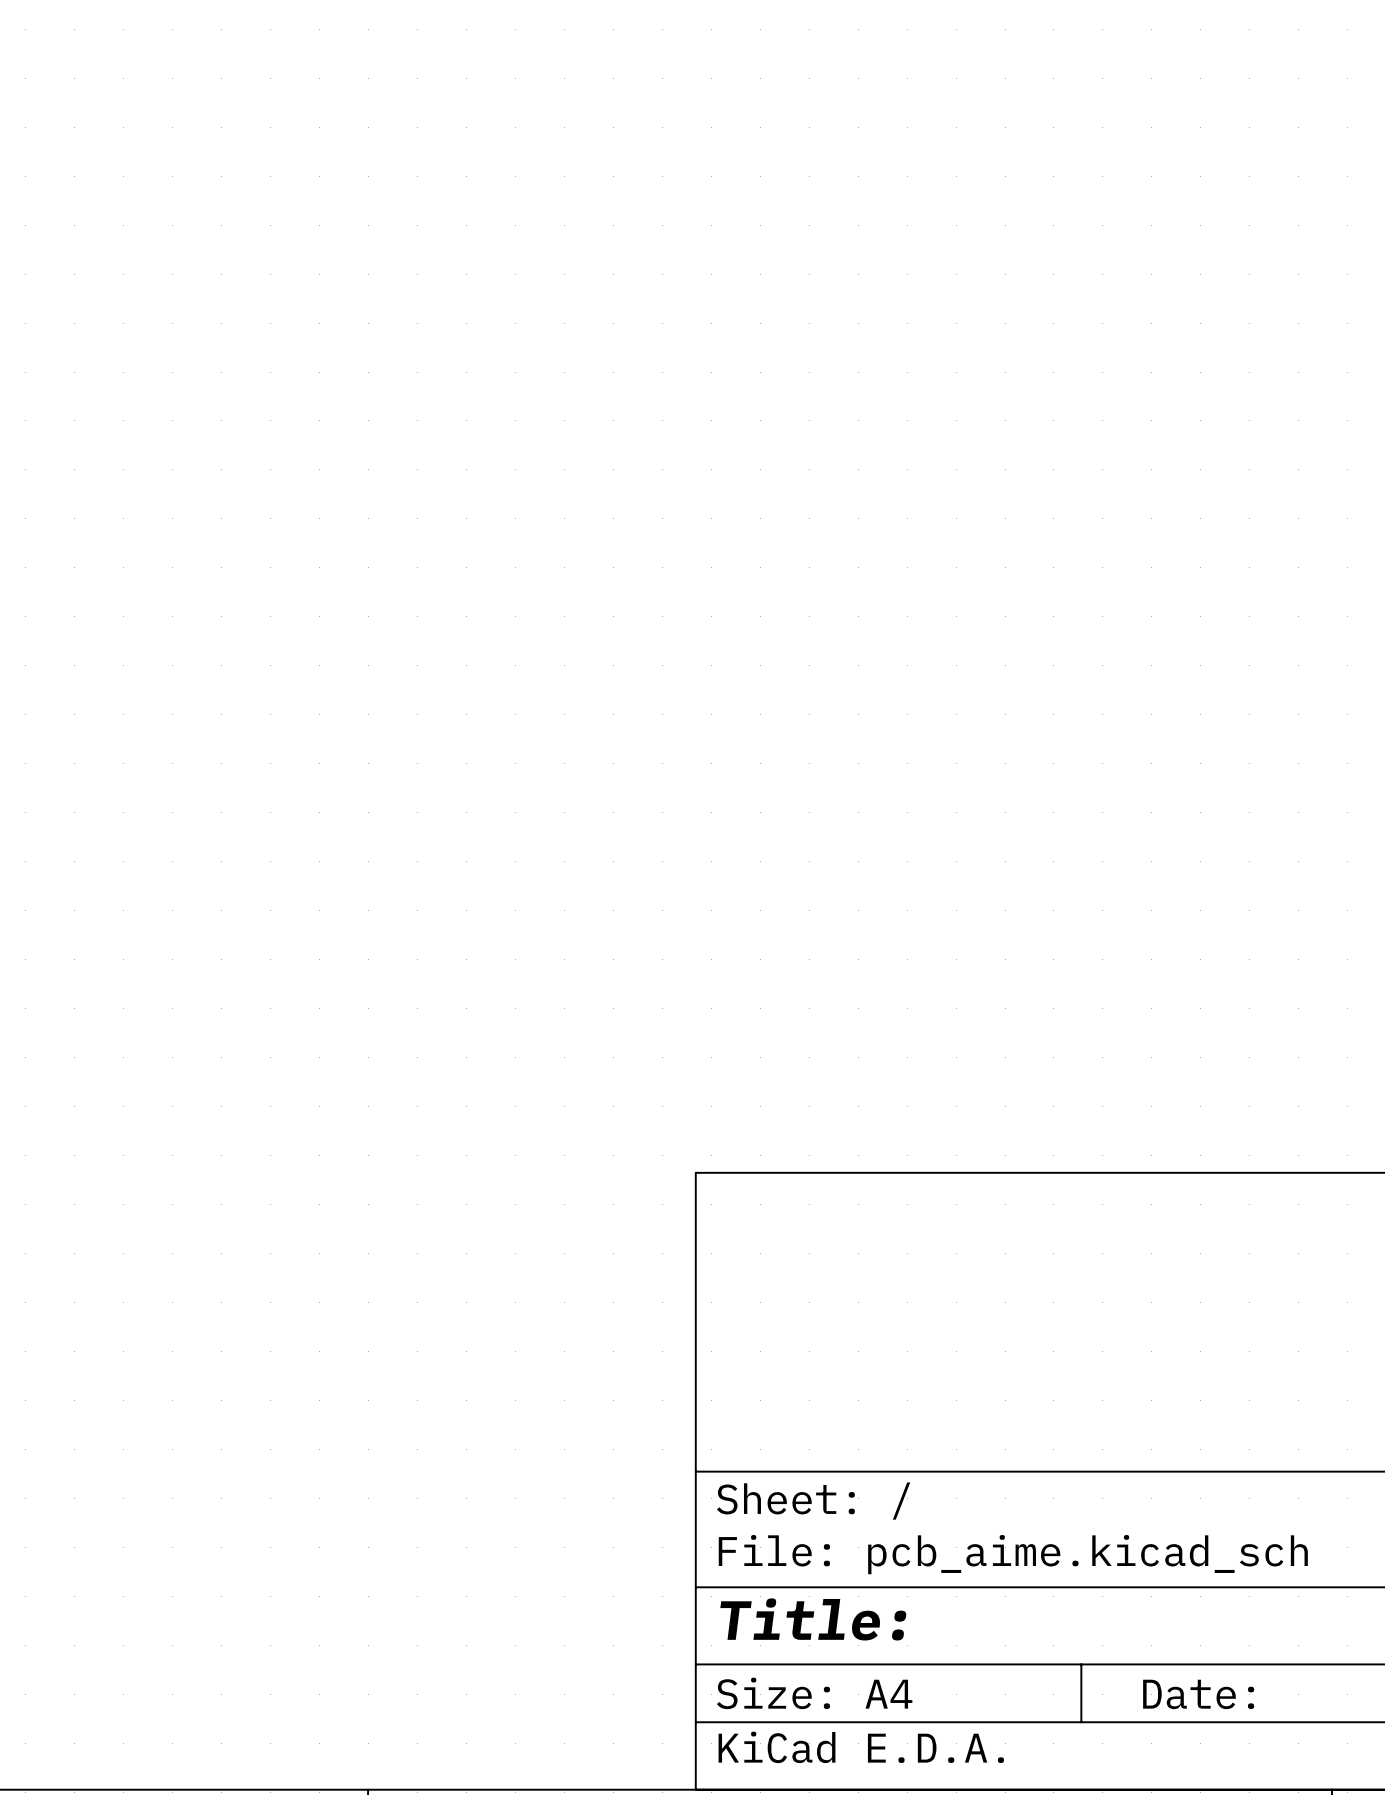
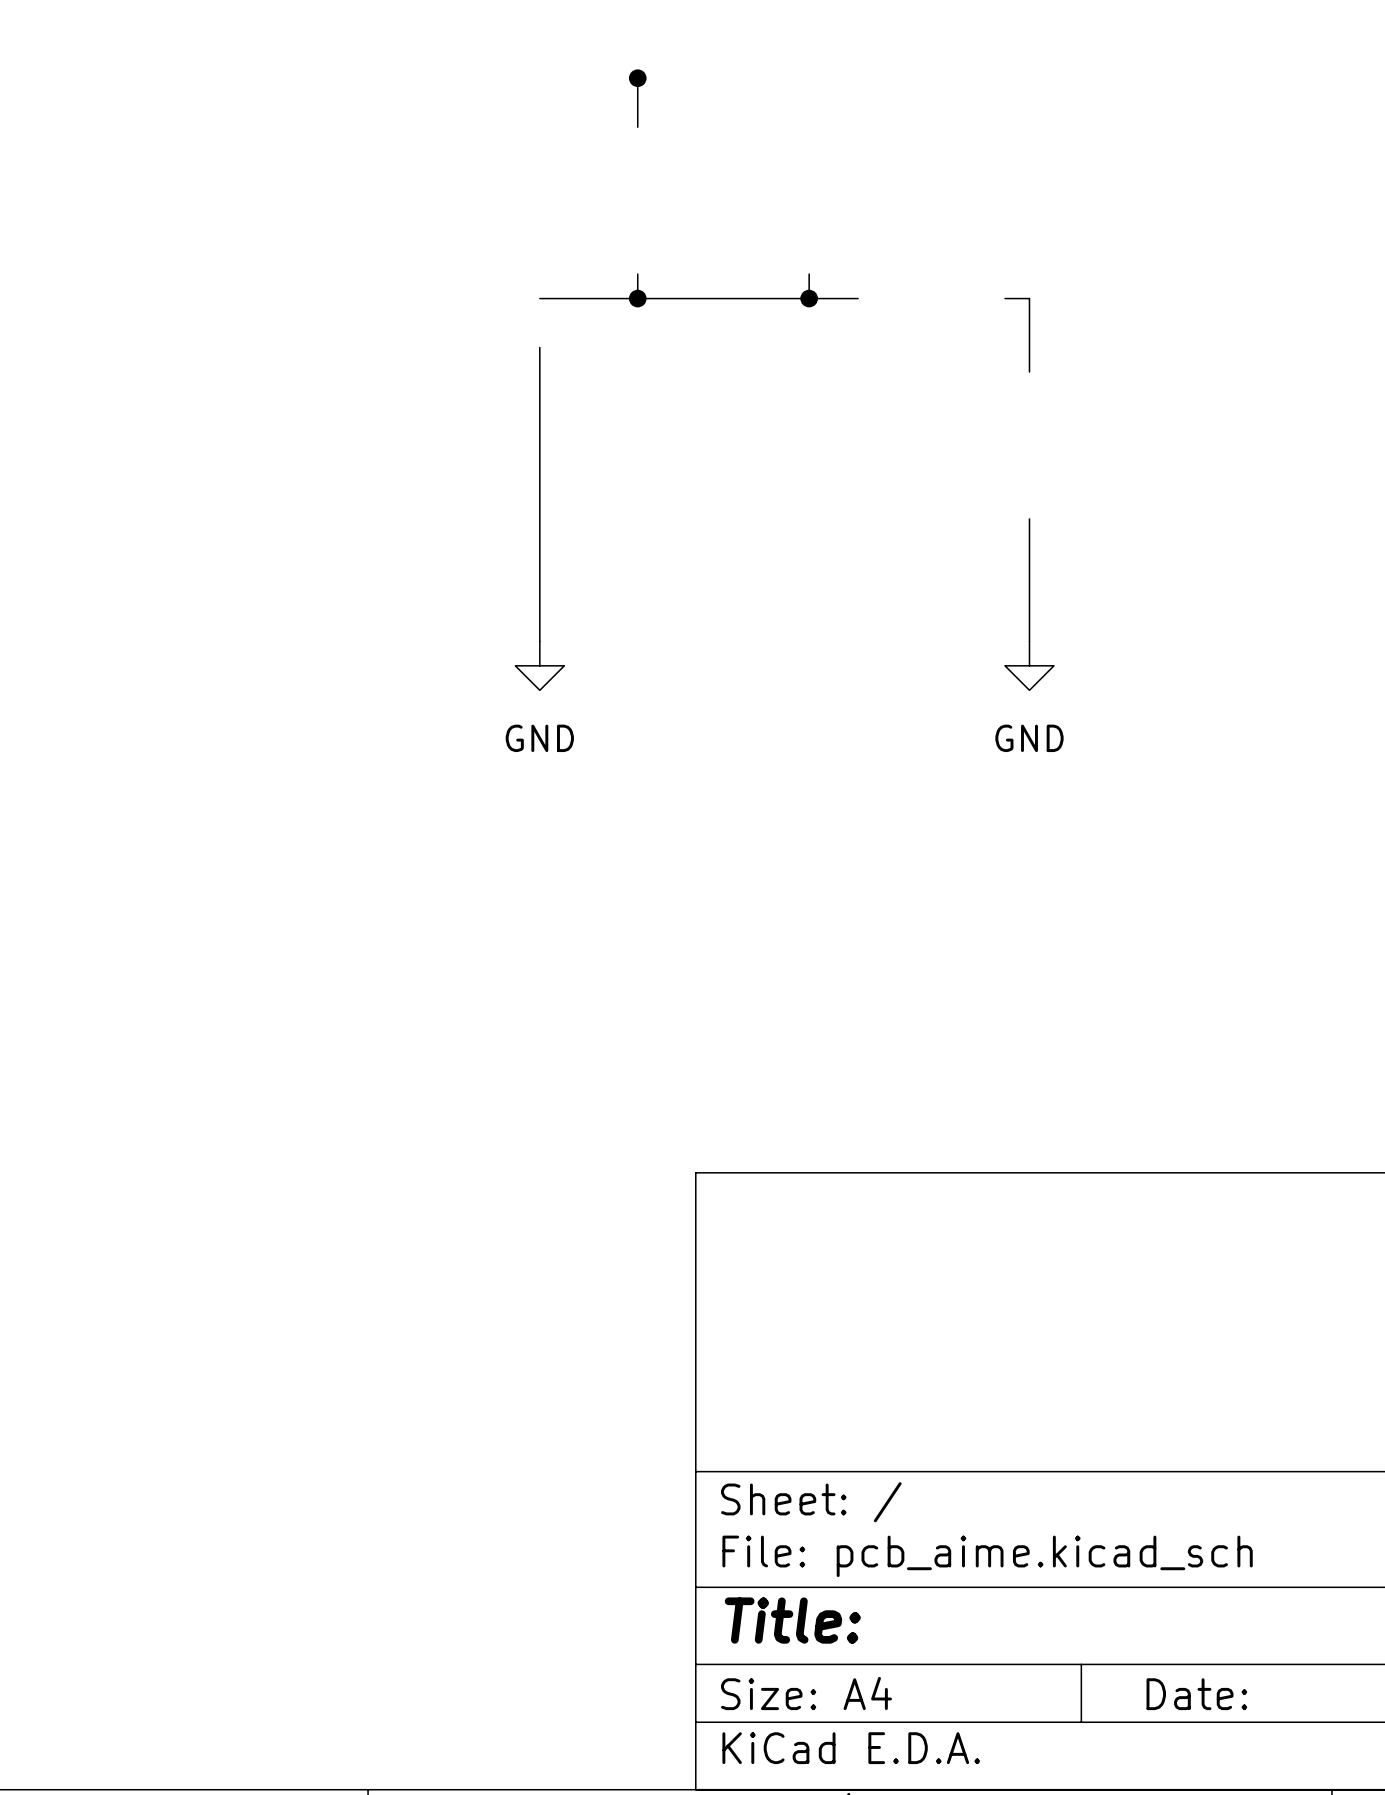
wire: none -> (637, 78) (637, 127)
junction: none -> (637, 78)
wire: none -> (637, 274) (637, 298)
wire: none -> (809, 274) (809, 298)
wire: none -> (539, 298) (858, 298)
junction: none -> (637, 298)
junction: none -> (809, 298)
wire: none -> (1005, 298) (1029, 298) (1029, 372)
wire: none -> (539, 347) (539, 641)
wire: none -> (1029, 518) (1029, 641)
power symbol: none -> GND (539, 665)
power symbol: none -> GND (1029, 665)

